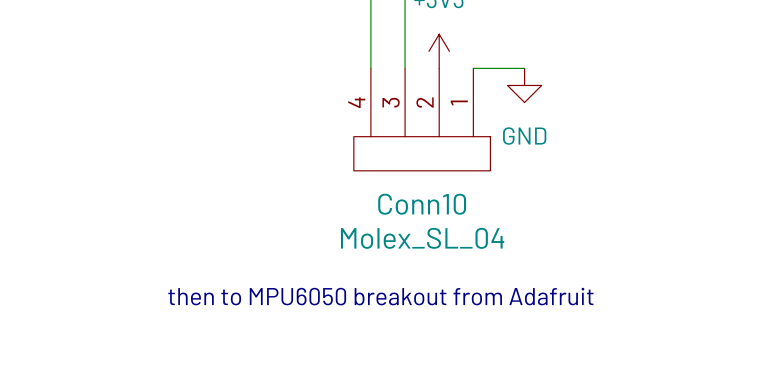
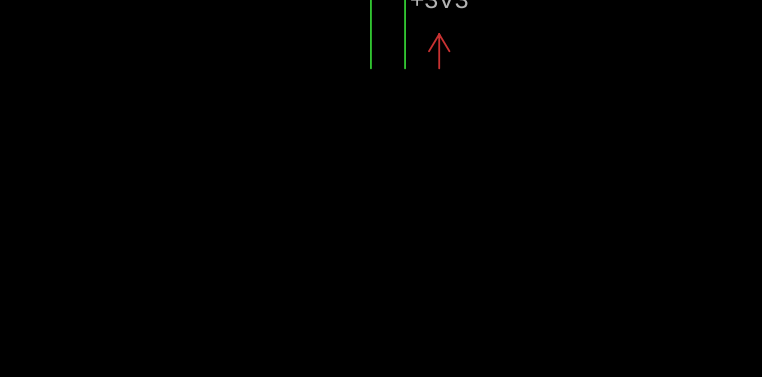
wire: (473, 68) (524, 68) -> none
power symbol: GND (524, 85) -> none
Conn10: Molex_SL_04 (422, 119) -> none
text: then to MPU6050 breakout from Adafruit (380, 296) -> none

